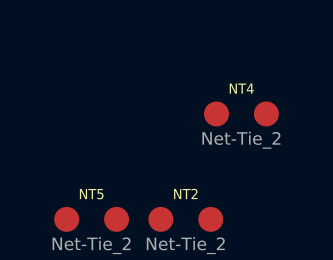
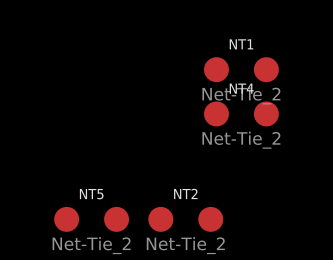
NT1: none -> Net-Tie_2 (241, 69)

